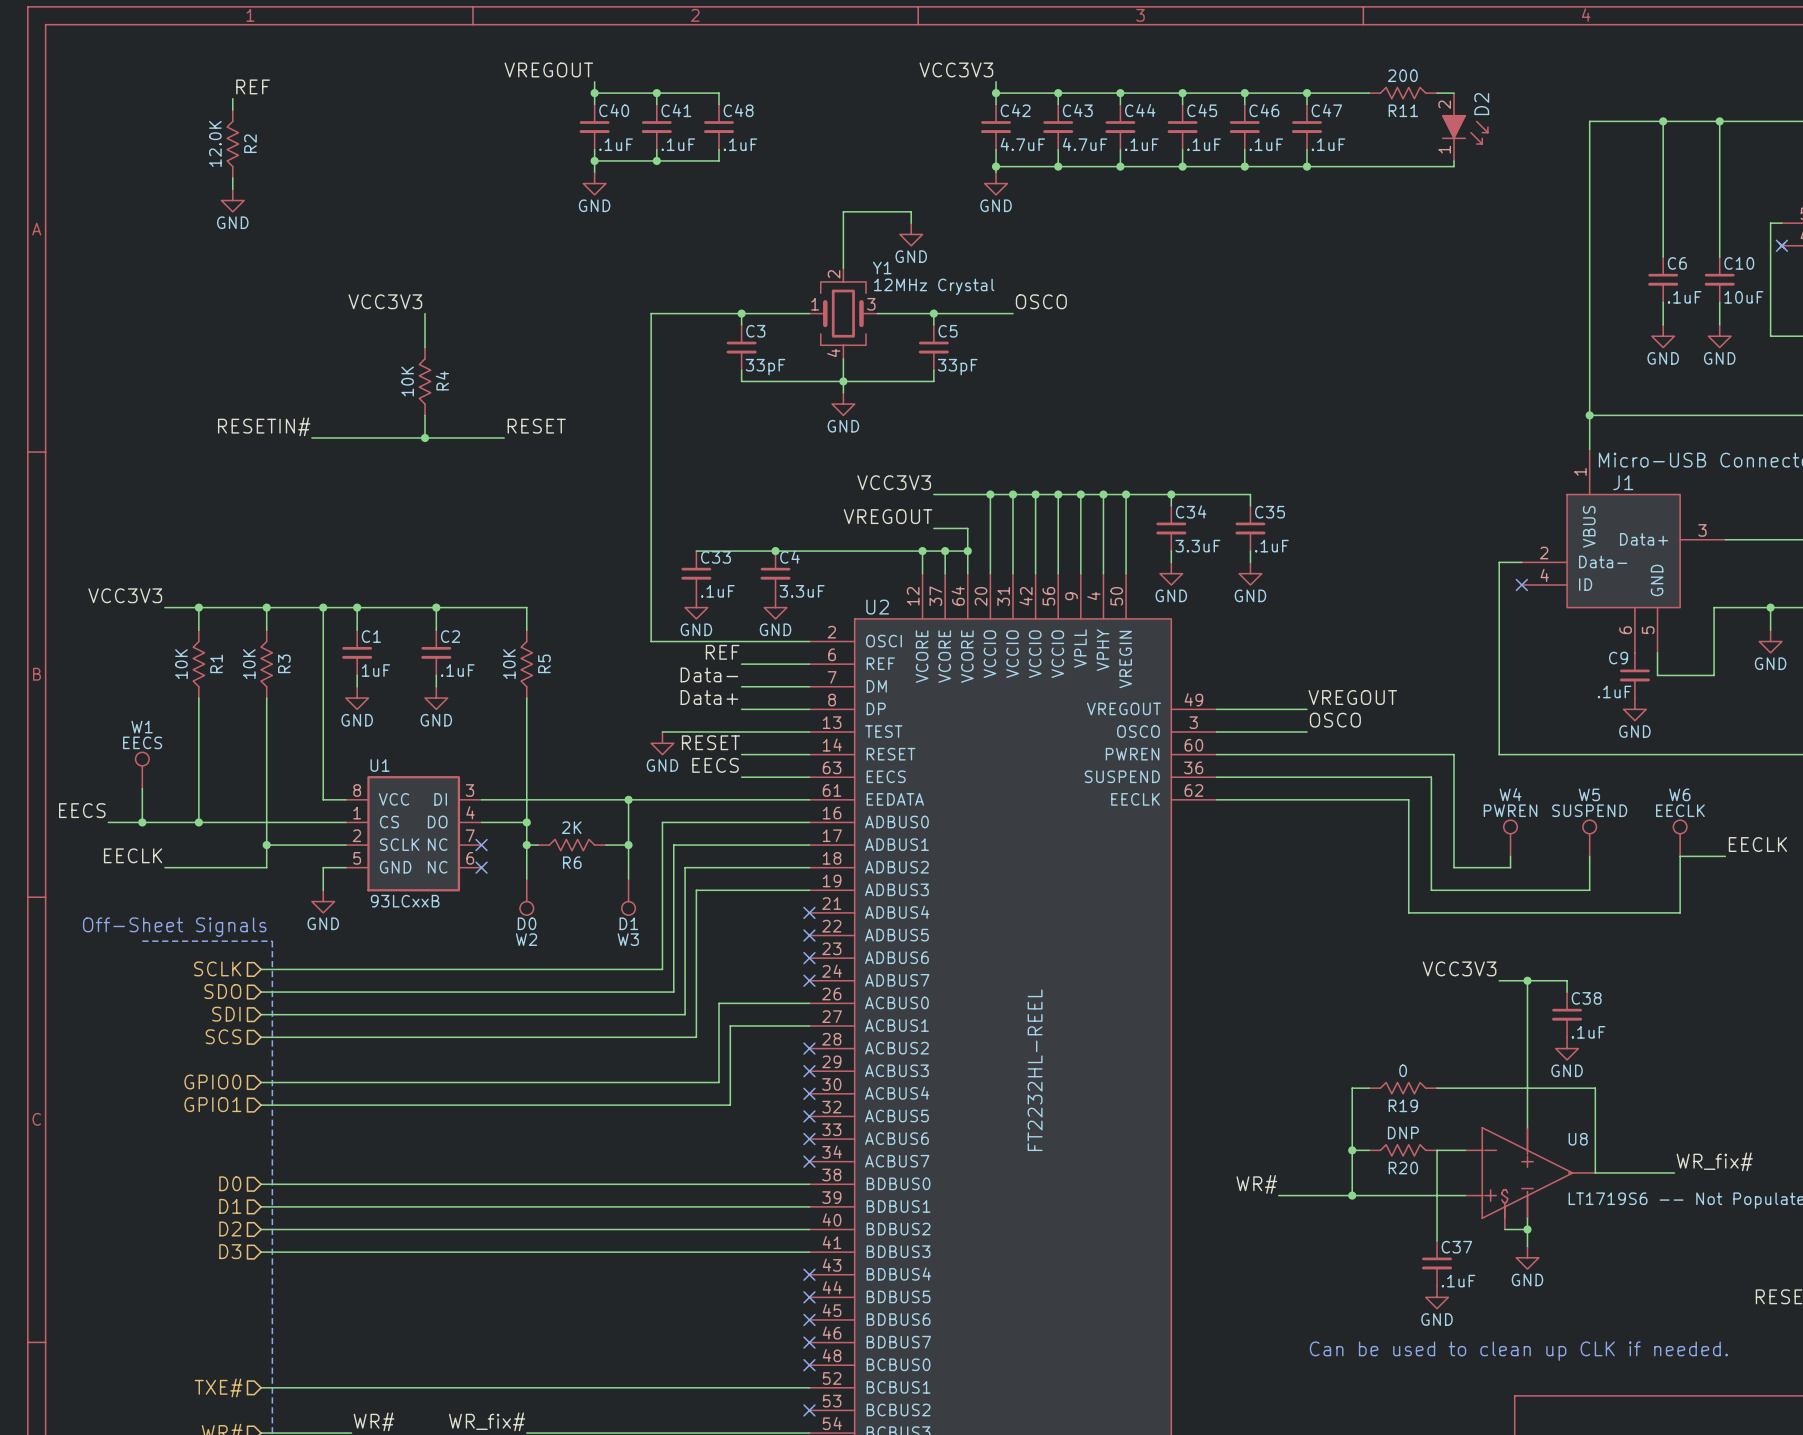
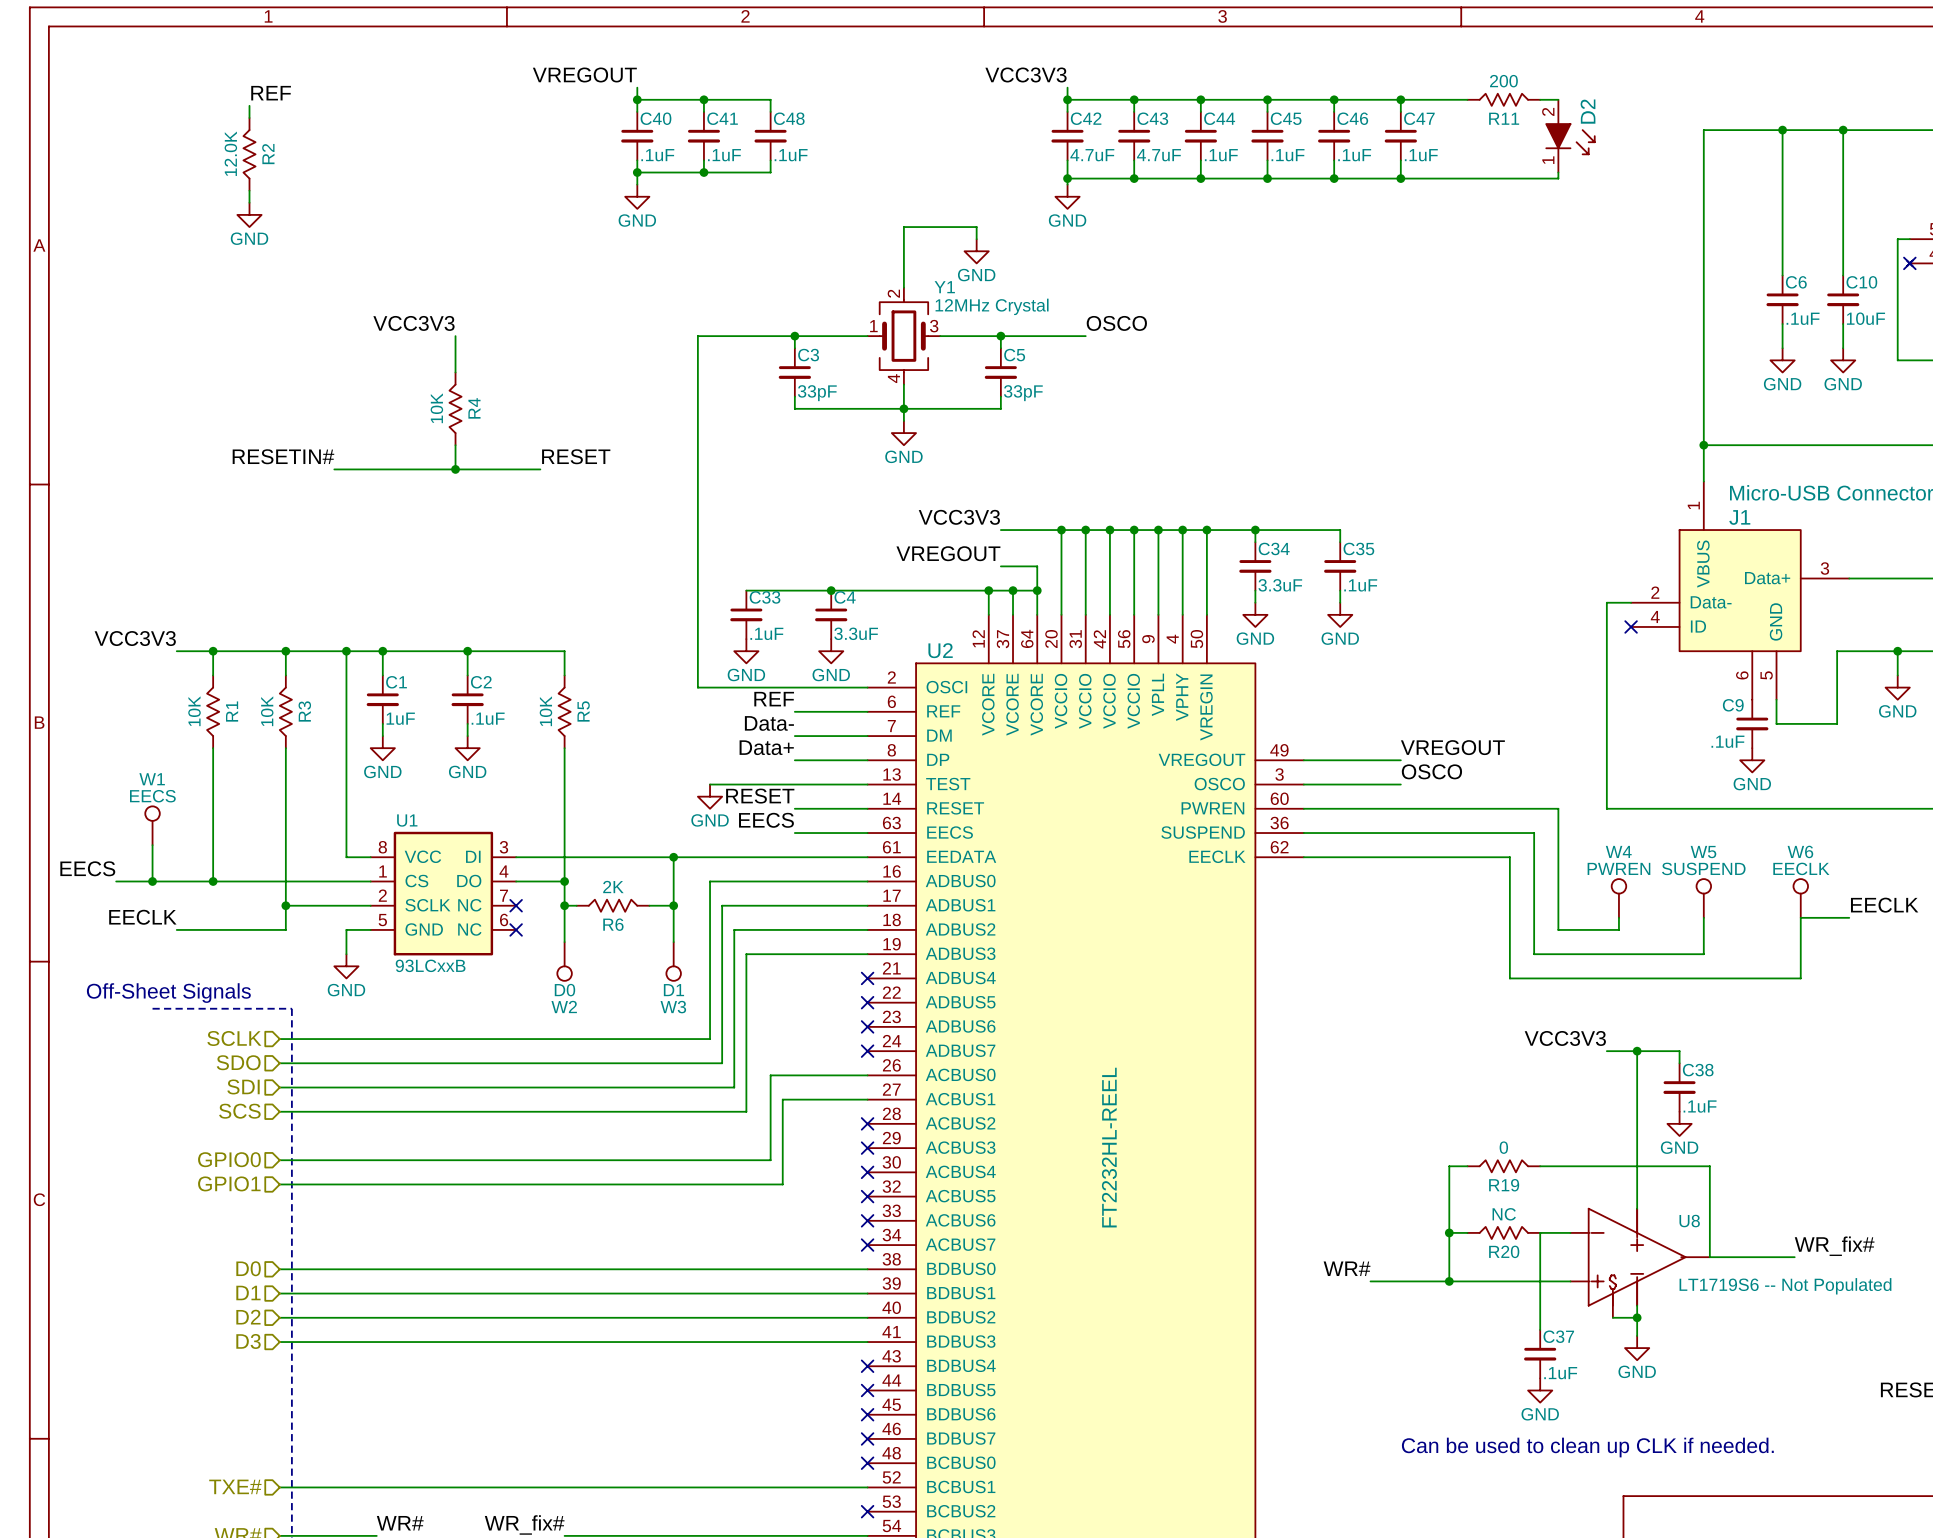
R20 value: DNP (1403, 1132) -> NC (1504, 1214)

